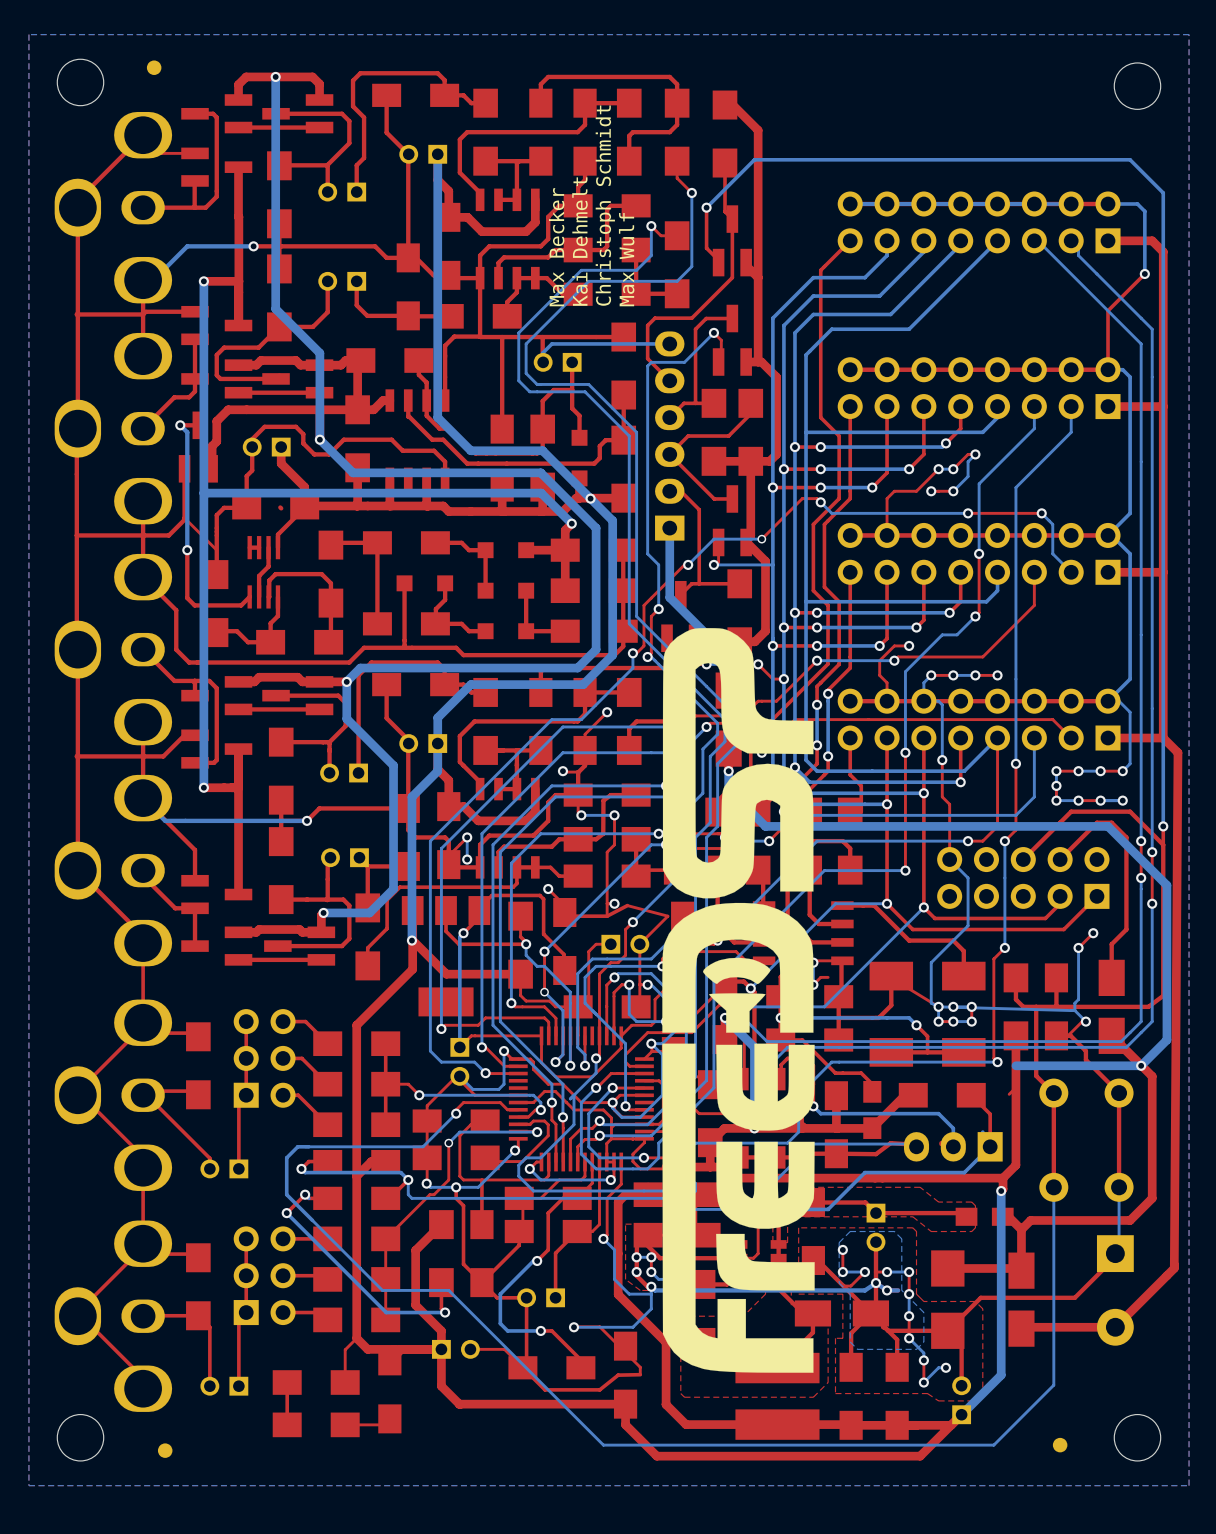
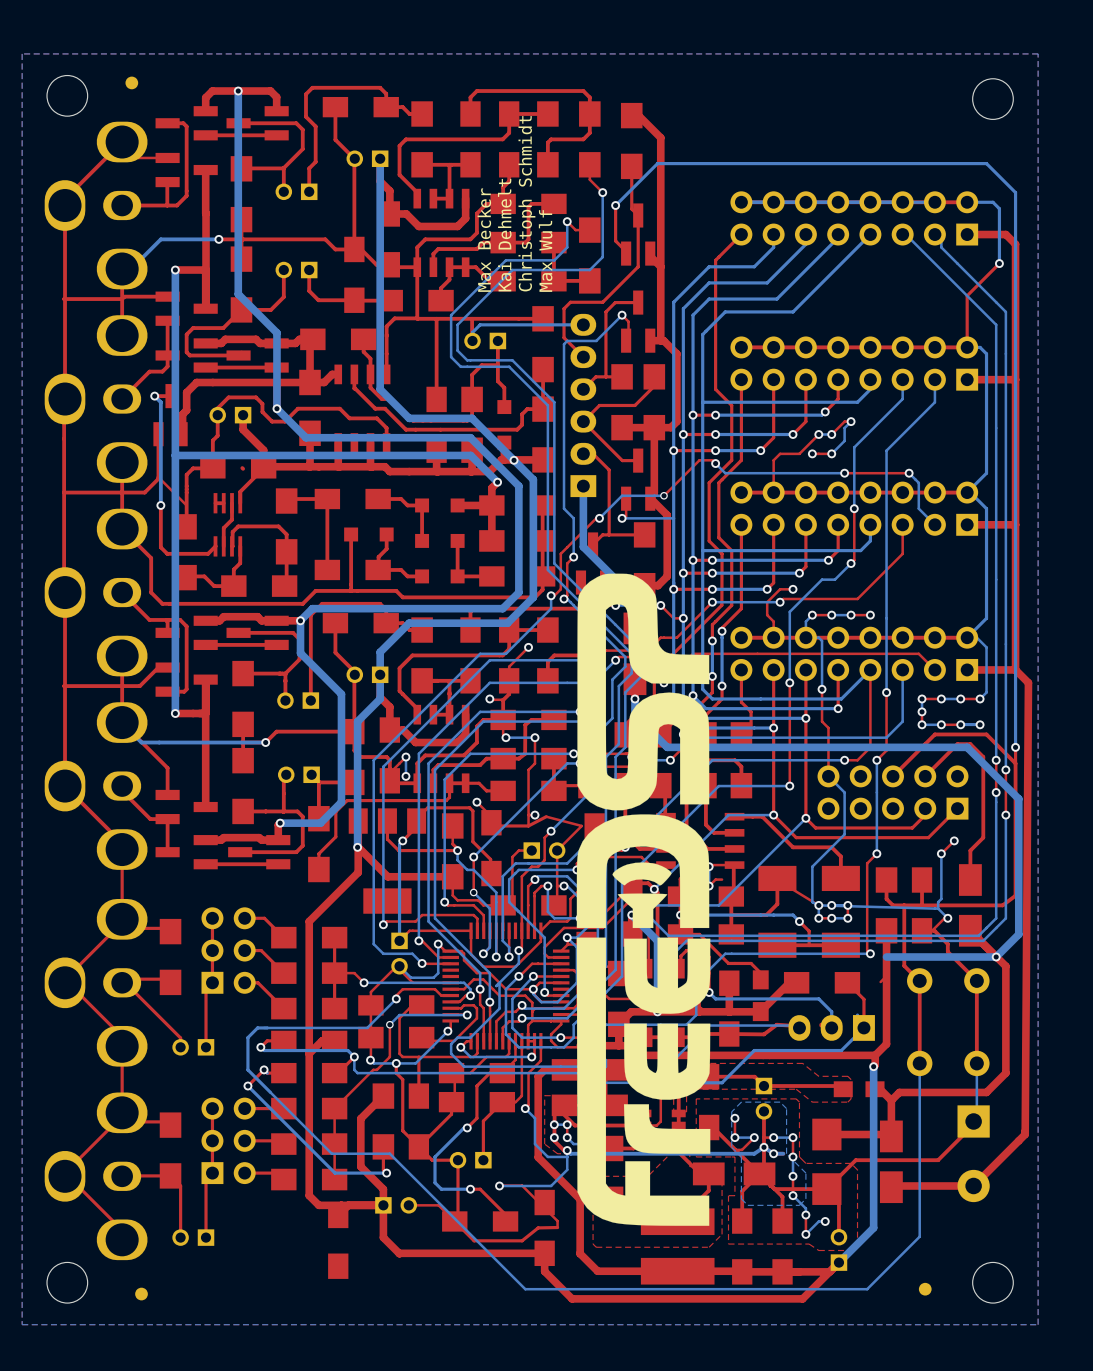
top track: (356, 1338) (345, 1349) (345, 1382) -> none
top track: (287, 1382) (287, 1424) -> none
part: (316, 1382) -> none
top track: (389, 1418) (383, 1424) (345, 1424) -> none
part: (316, 1424) -> none

